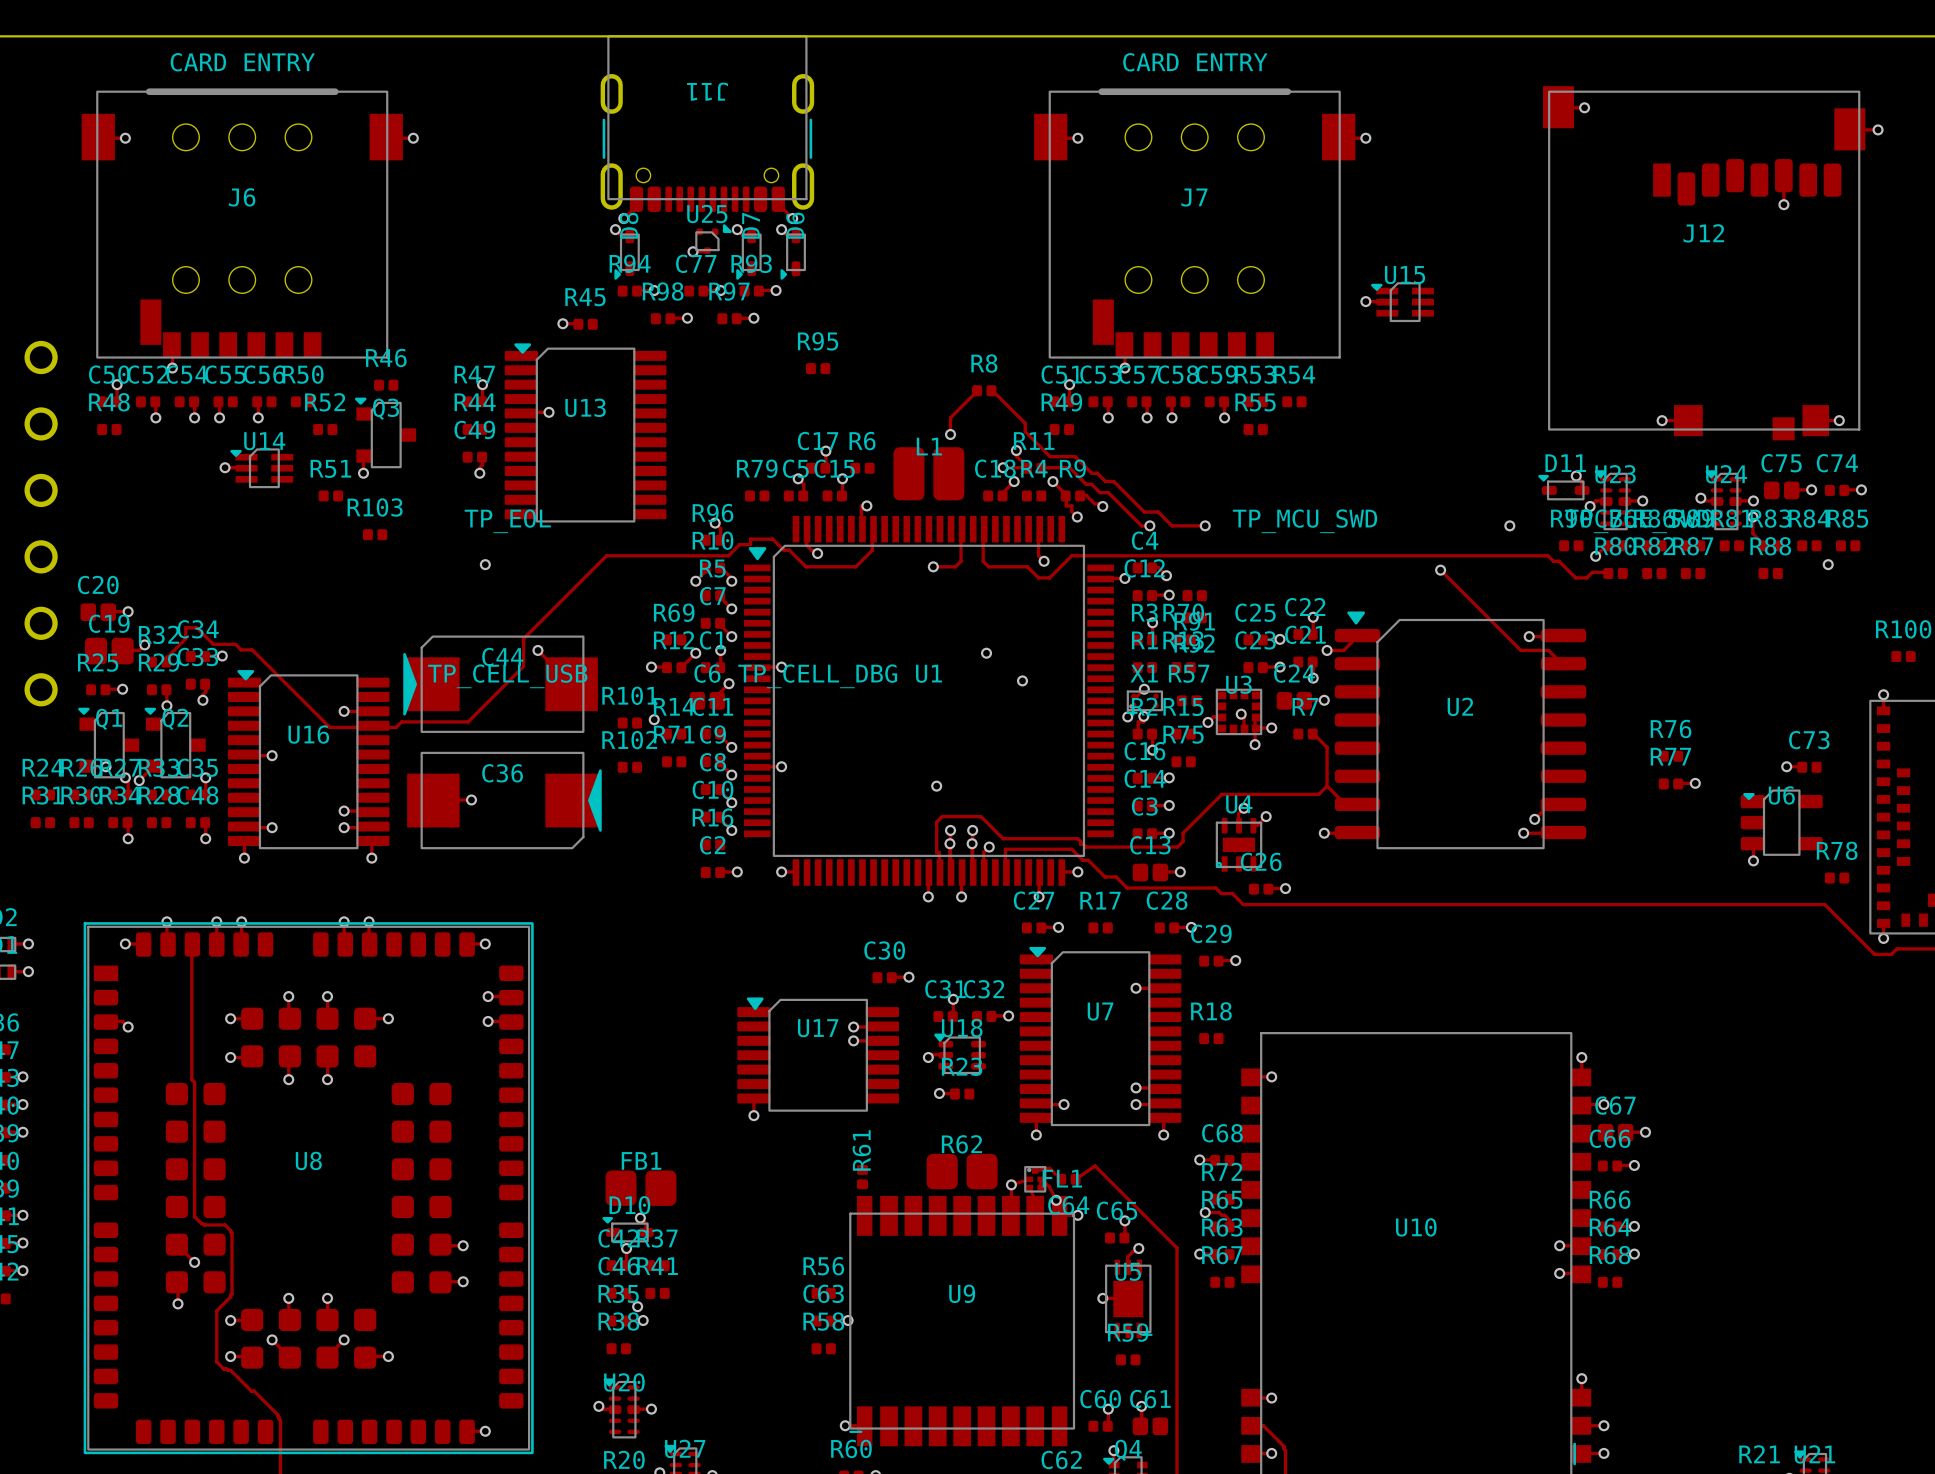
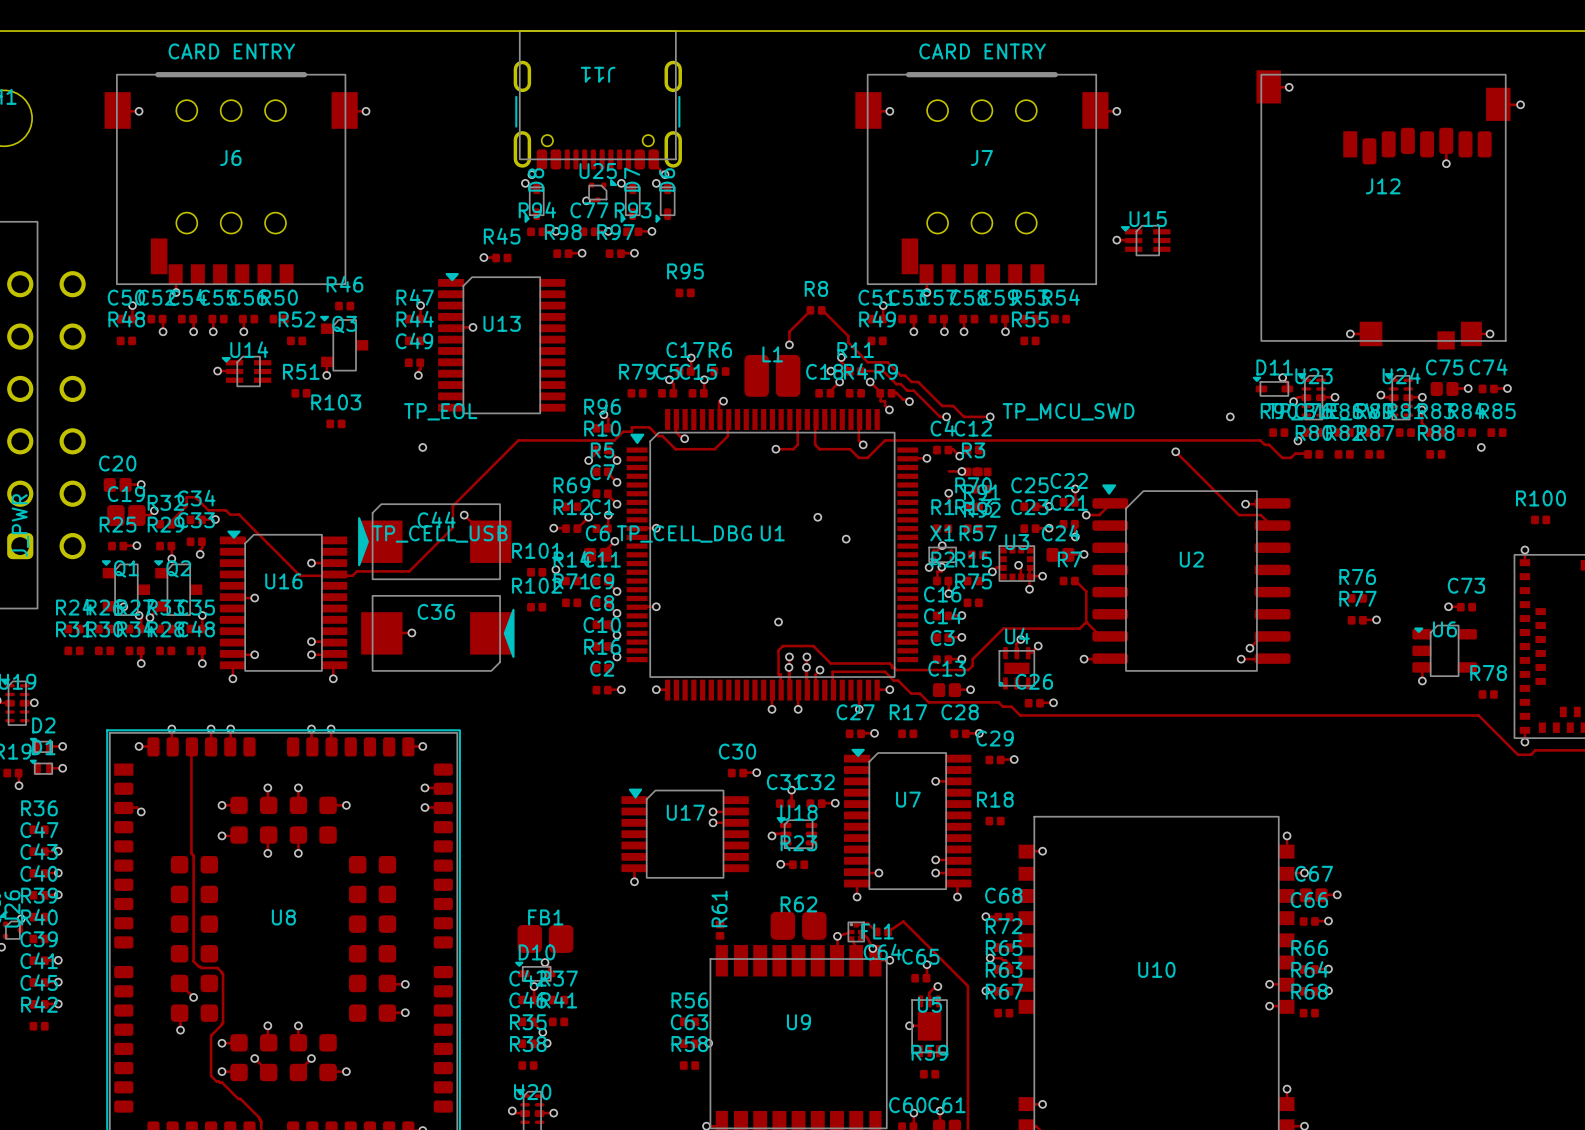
C12 position: (1144, 595) -> (973, 450)
R3 position: (1144, 639) -> (973, 471)

